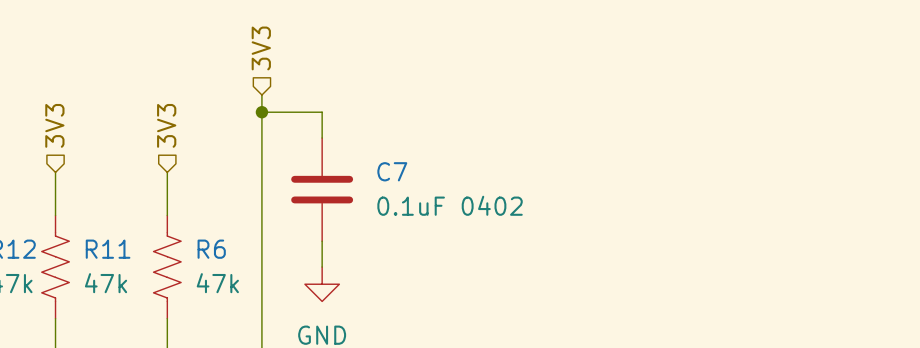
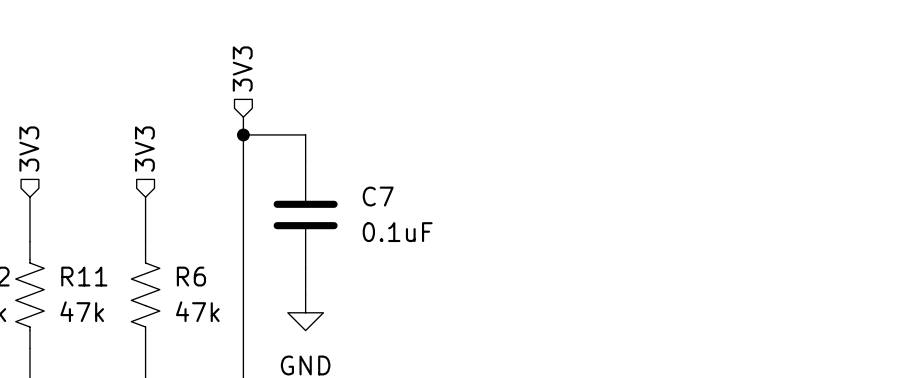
C7 value: 0.1uF 0402 (450, 205) -> 0.1uF (397, 232)

